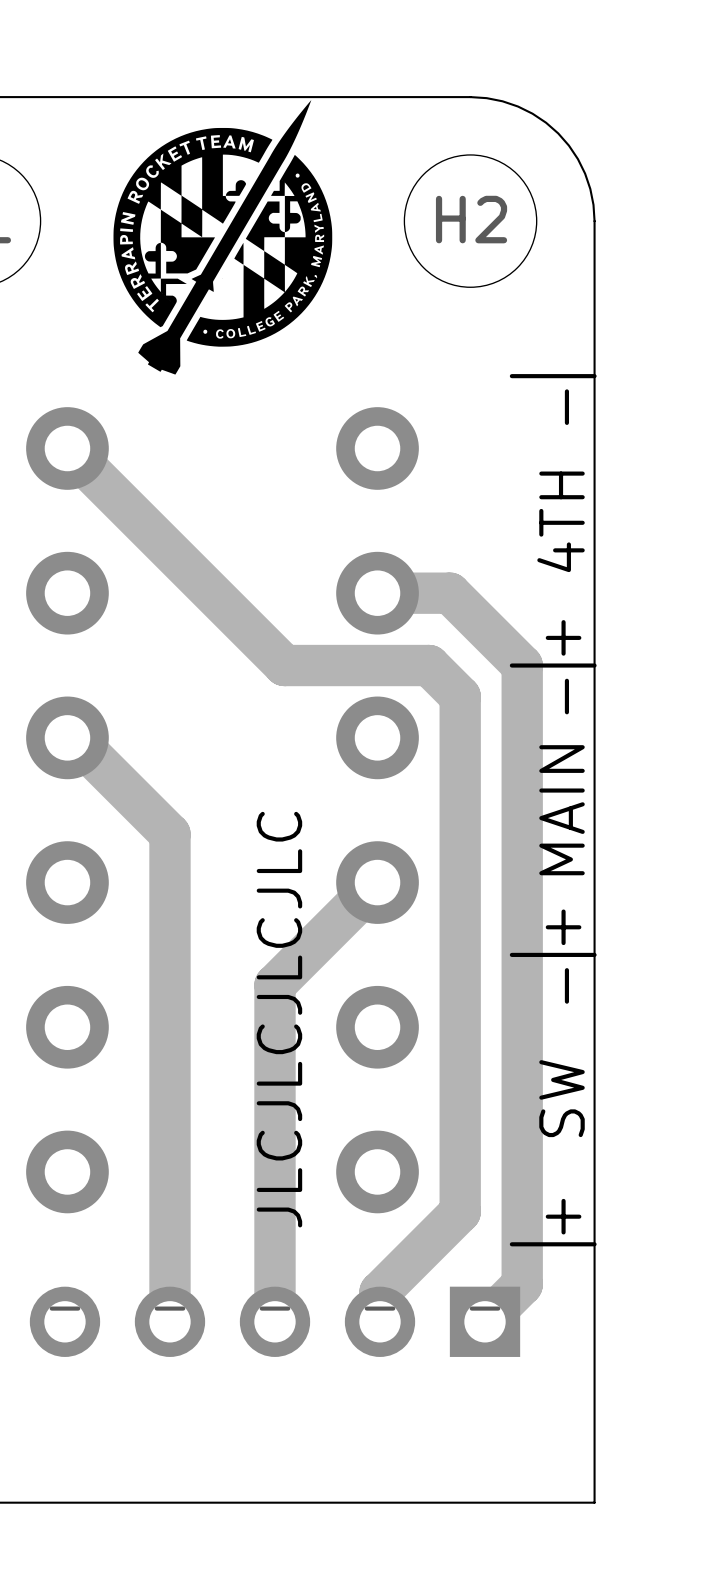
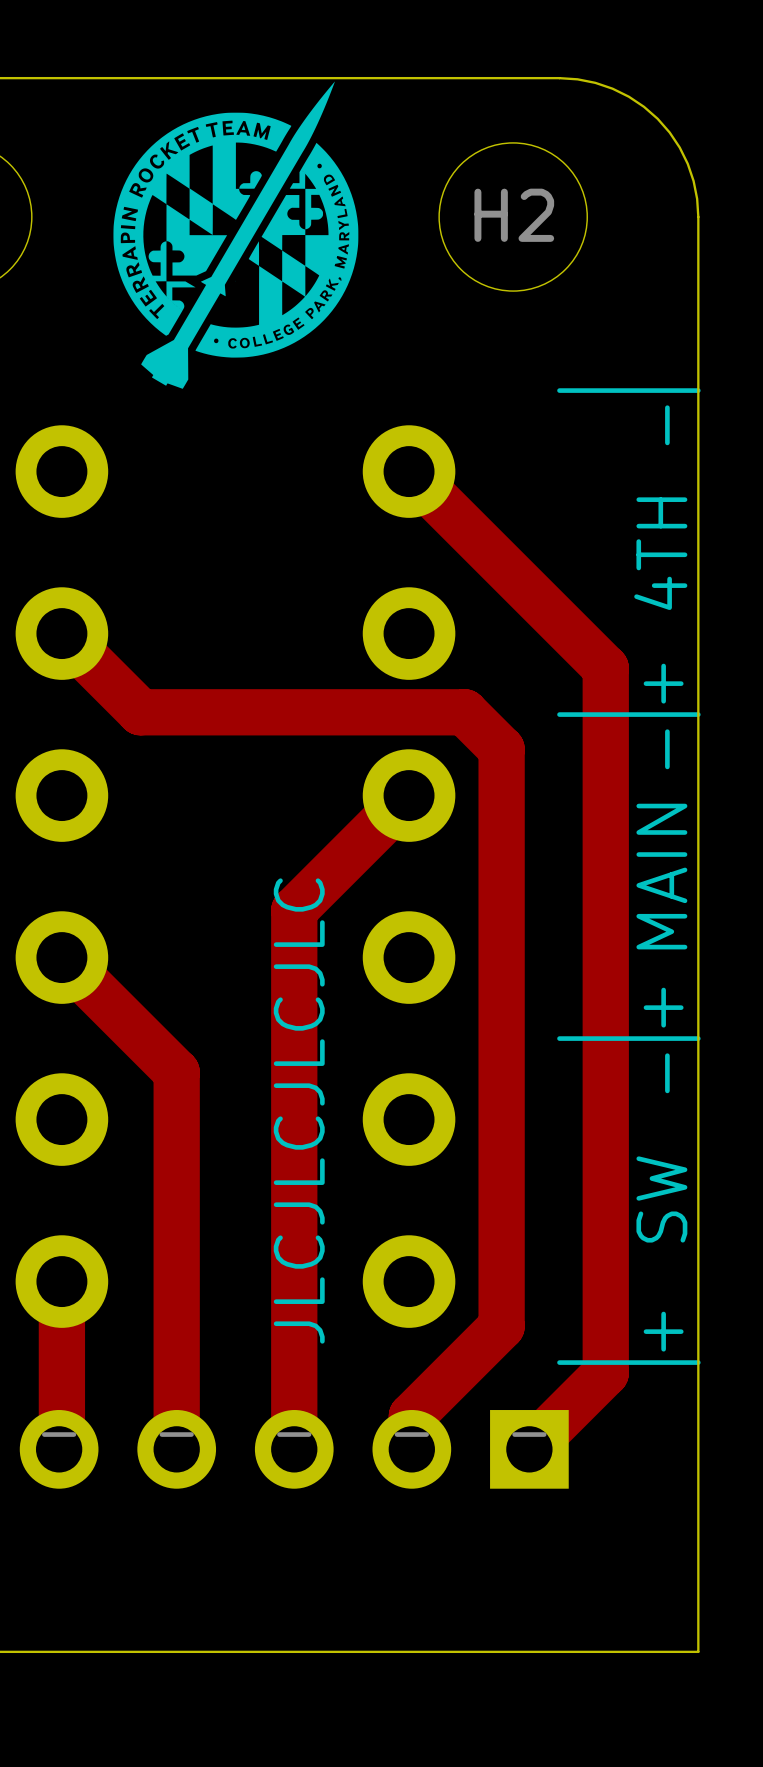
board edge: (470, 97) (486, 98) (518, 106) (532, 113) (558, 133) (577, 159) (585, 173) (593, 204) (594, 1502) -> (513, 78) (577, 79) (595, 82) (628, 96) (657, 118) (679, 147) (693, 181) (697, 198) (698, 1651) (652, 1651)
line: none -> (652, 390) (698, 390)
text position: - (566, 407) -> - (667, 425)
track: (67, 448) (284, 665) (429, 665) -> (61, 633) (140, 712) (464, 712) (466, 714)
text position: 4TH (561, 521) -> 4TH (660, 553)
track: (377, 593) (449, 593) (522, 665) (522, 1284) -> (409, 471) (605, 668) (605, 1372) (571, 1407)
text position: + (563, 637) -> + (663, 683)
line: none -> (652, 714) (698, 714)
text position: - (566, 696) -> - (667, 749)
track: (73, 737) (169, 834) (169, 985) -> (61, 957) (176, 1072)
text position: MAIN (562, 810) -> MAIN (661, 876)
track: (377, 882) (274, 985) -> (409, 795) (294, 910) (294, 1072)
text position: + (563, 927) -> + (663, 1007)
line: none -> (652, 1038) (698, 1038)
text position: - (566, 985) -> - (667, 1073)
text position: SW (562, 1098) -> SW (661, 1199)
track: none -> (61, 1281) (61, 1446) (59, 1449)
text position: + (563, 1216) -> + (663, 1331)
line: none -> (652, 1362) (698, 1362)

